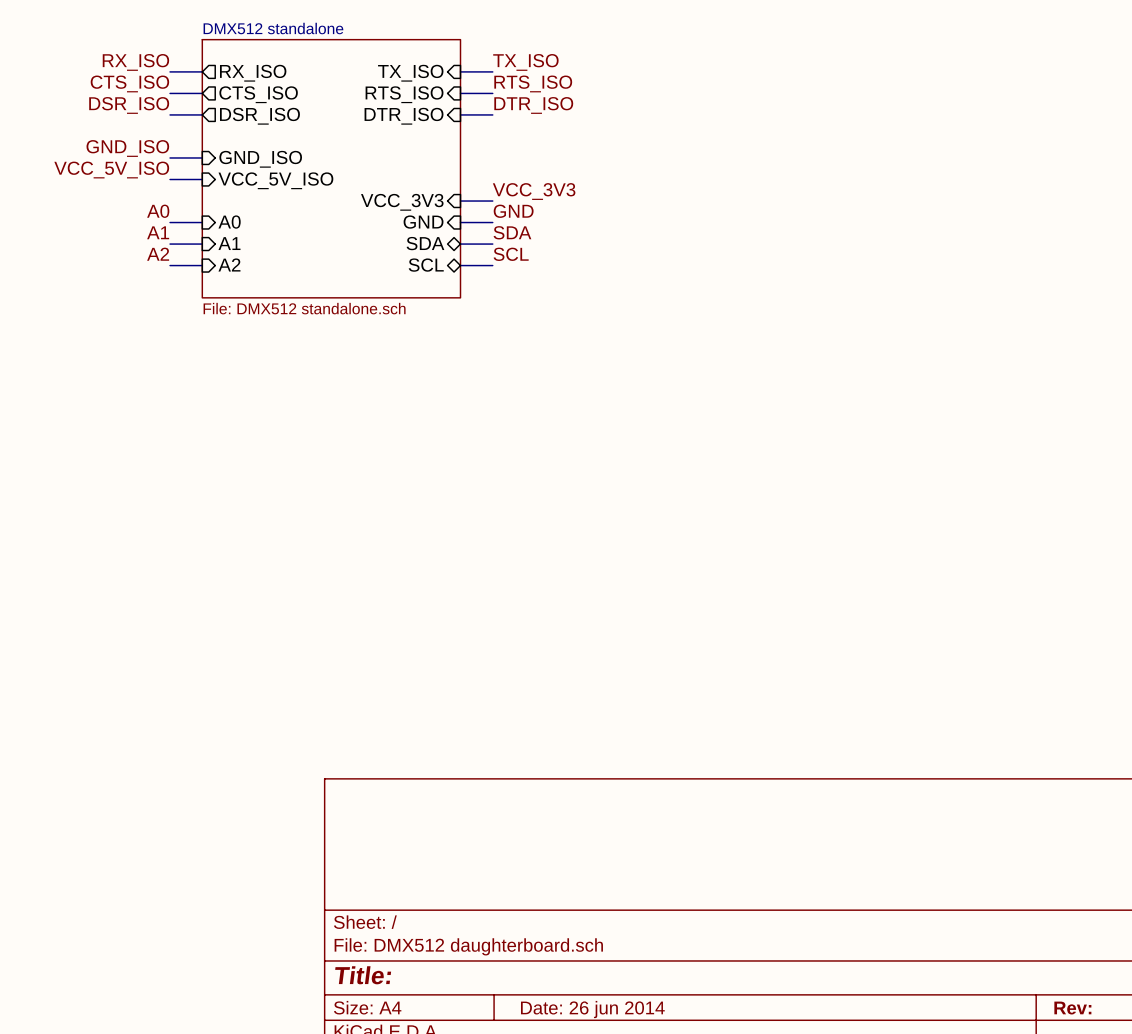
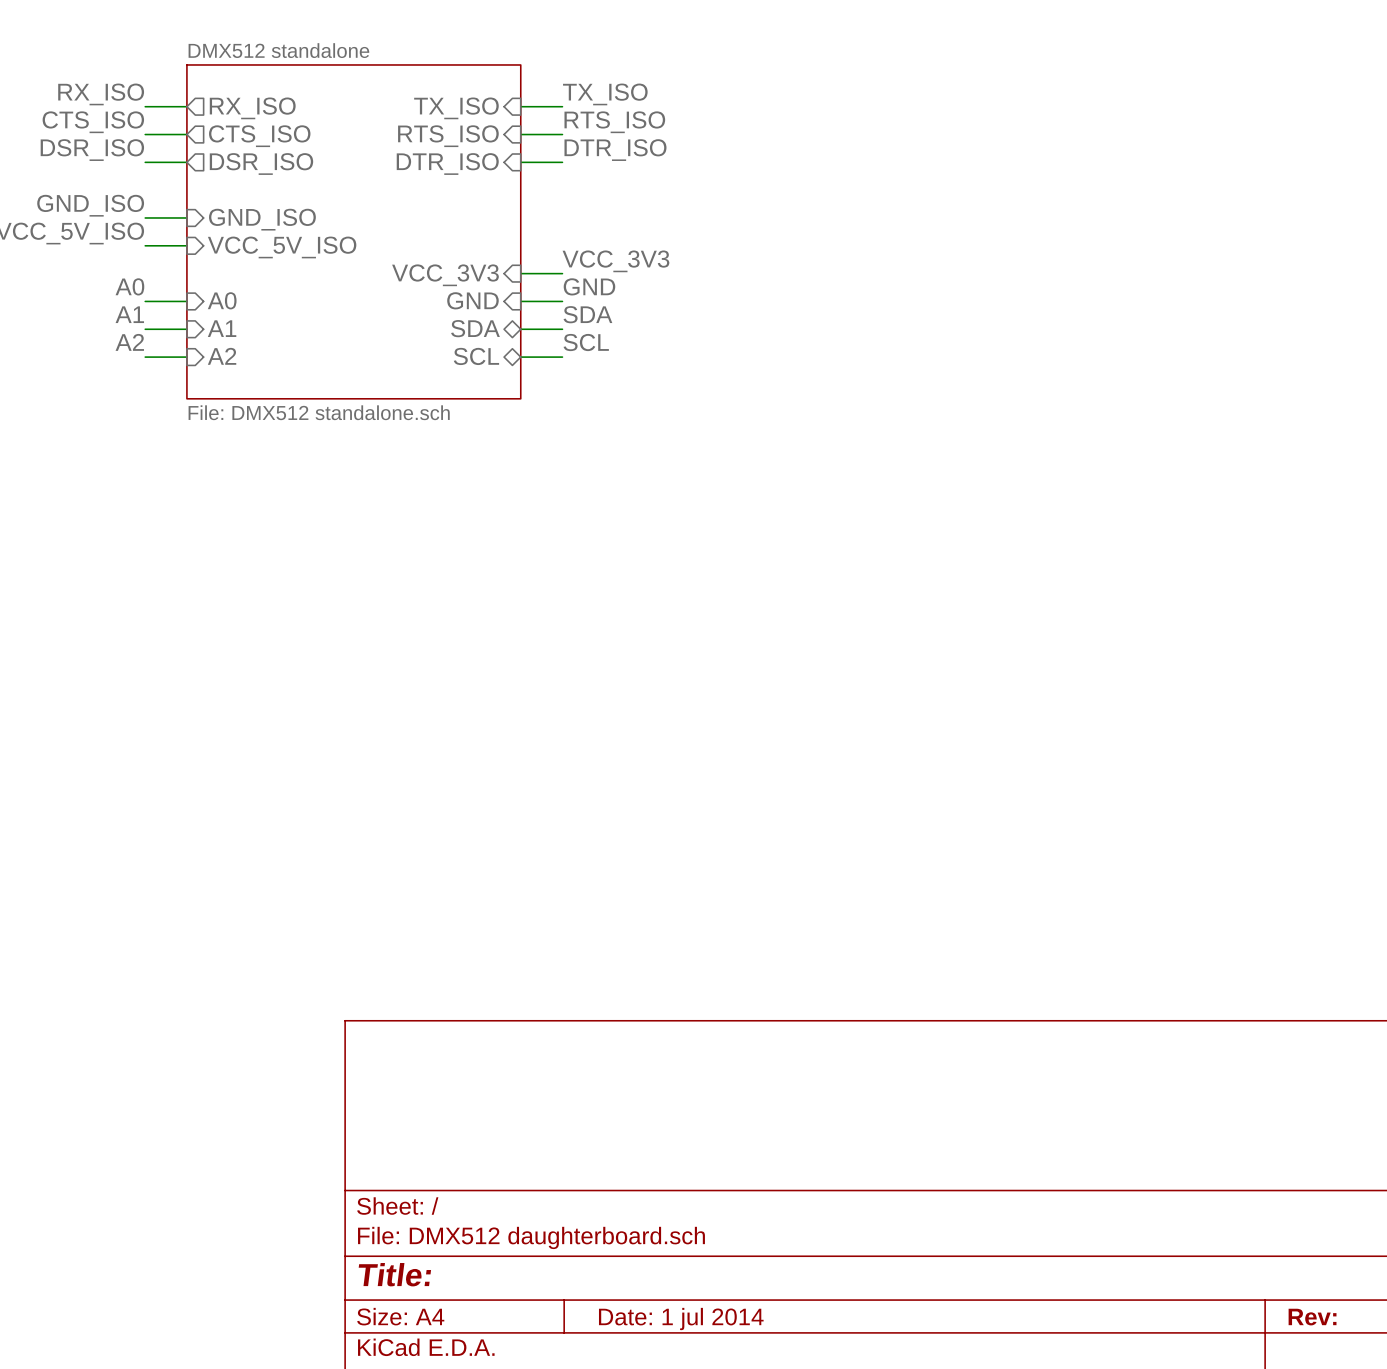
title block: Date: 26 jun 2014 (592, 1009) -> Date: 1 jul 2014 (681, 1319)

